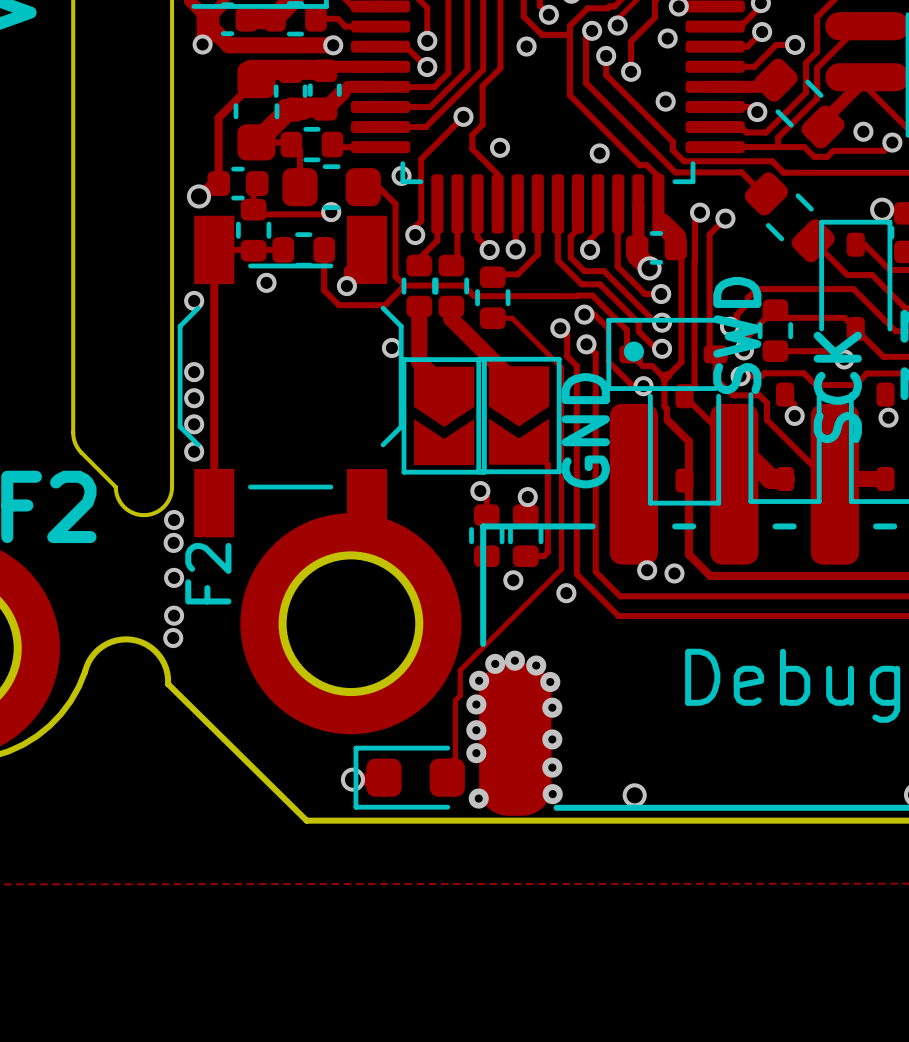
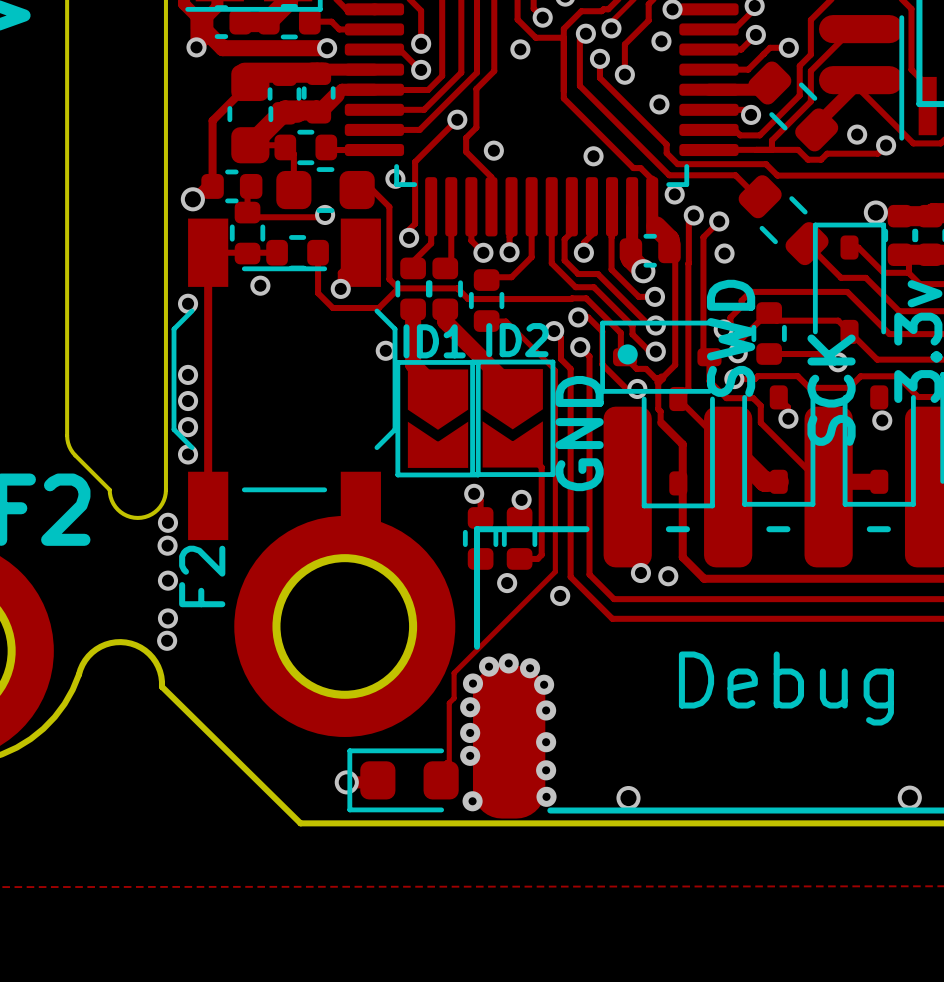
via: none -> (674, 194)
via: none -> (724, 253)
text: none -> ID2 (517, 340)
text: none -> ID1 (434, 341)

